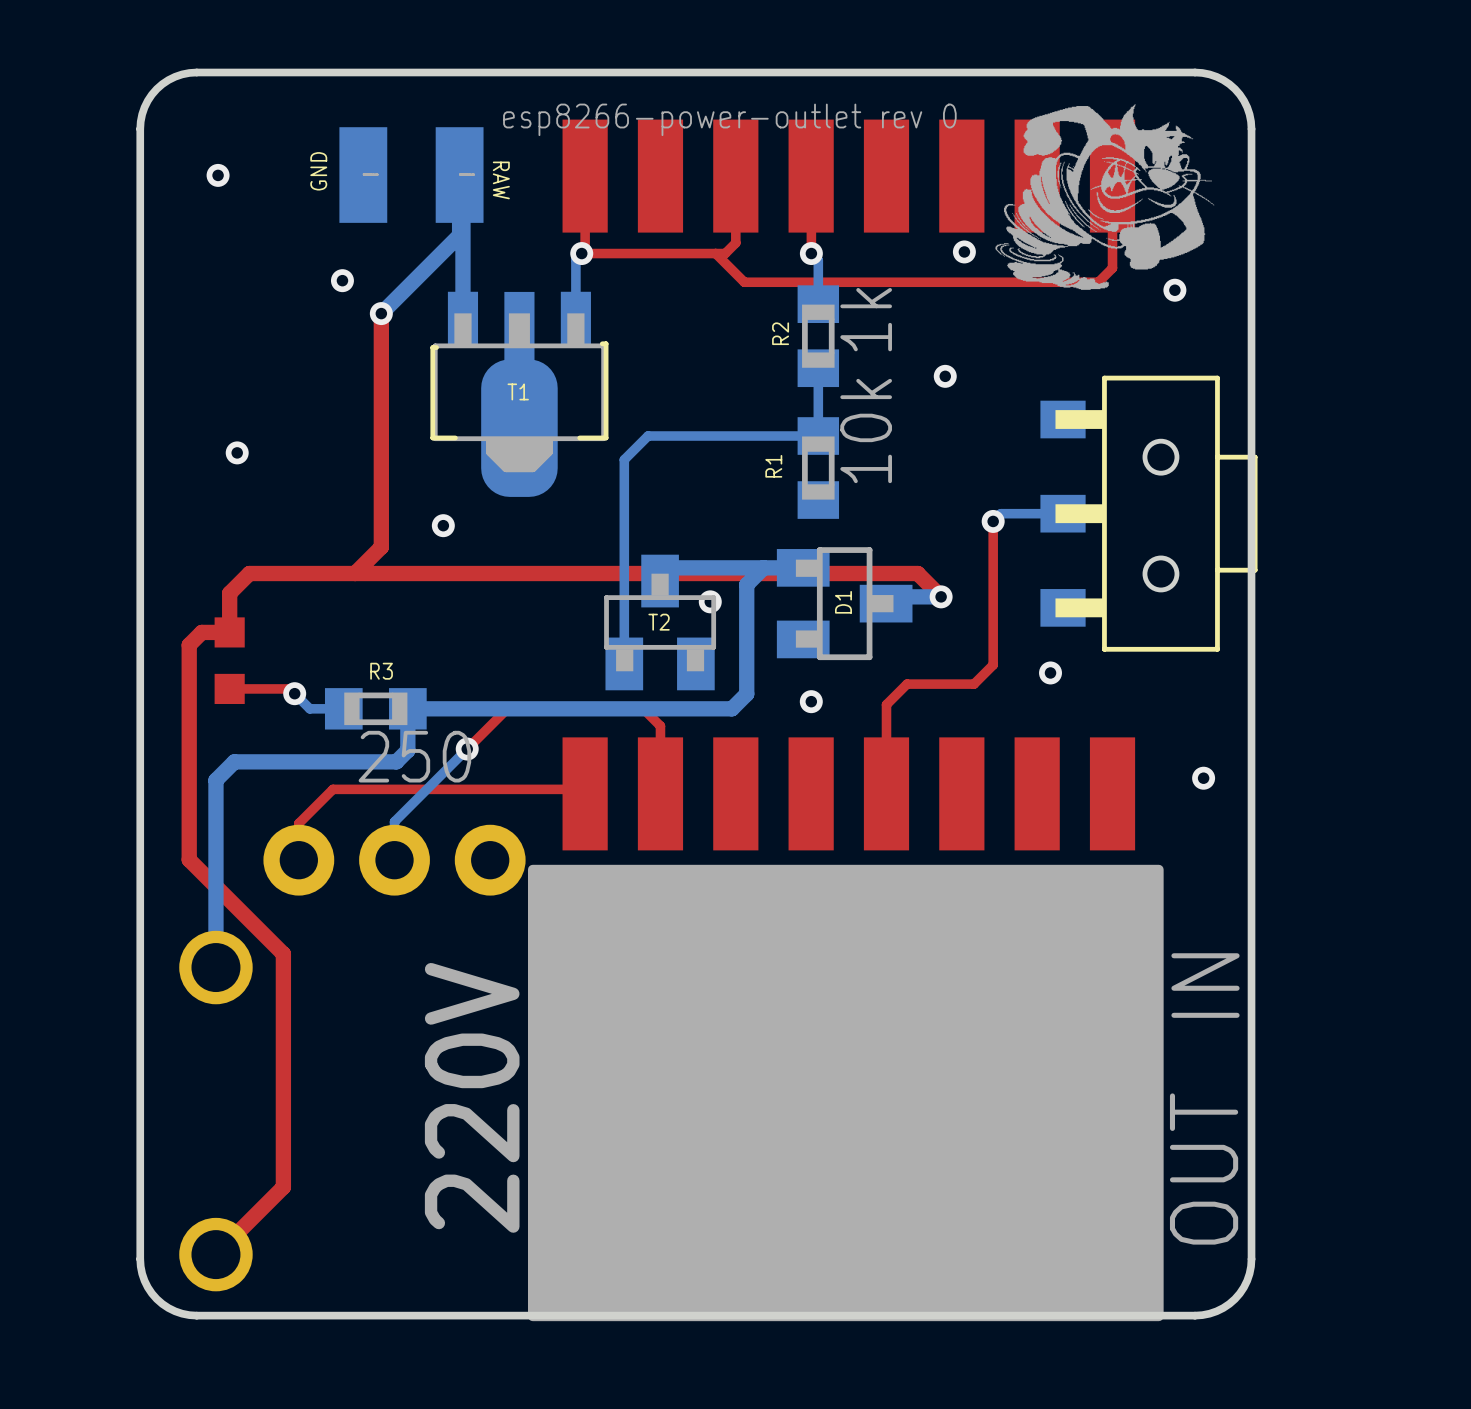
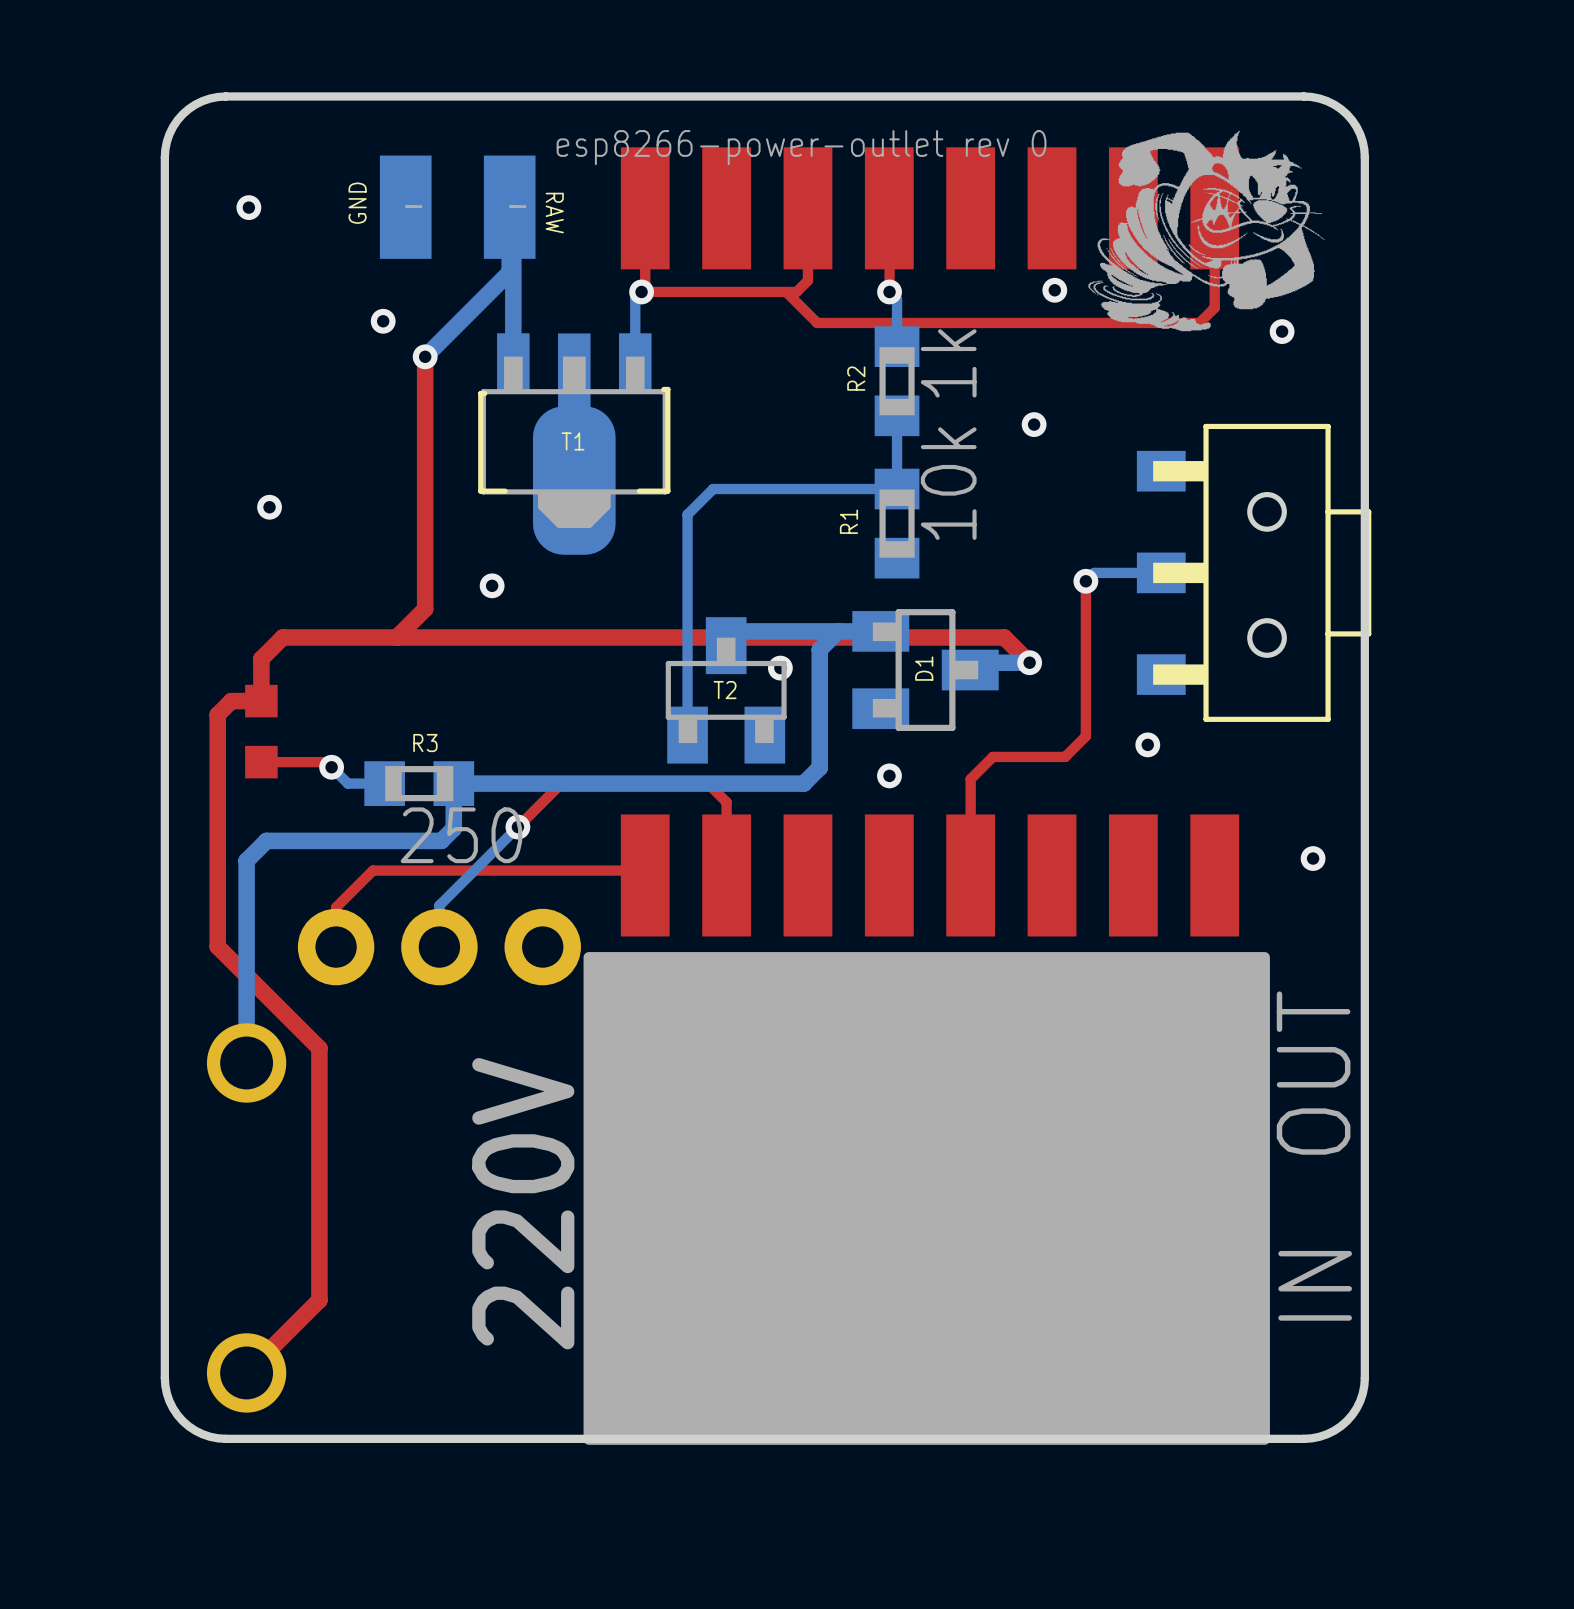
text position: IN (1205, 985) -> IN (1315, 1285)
text position: OUT (1204, 1169) -> OUT (1313, 1073)

